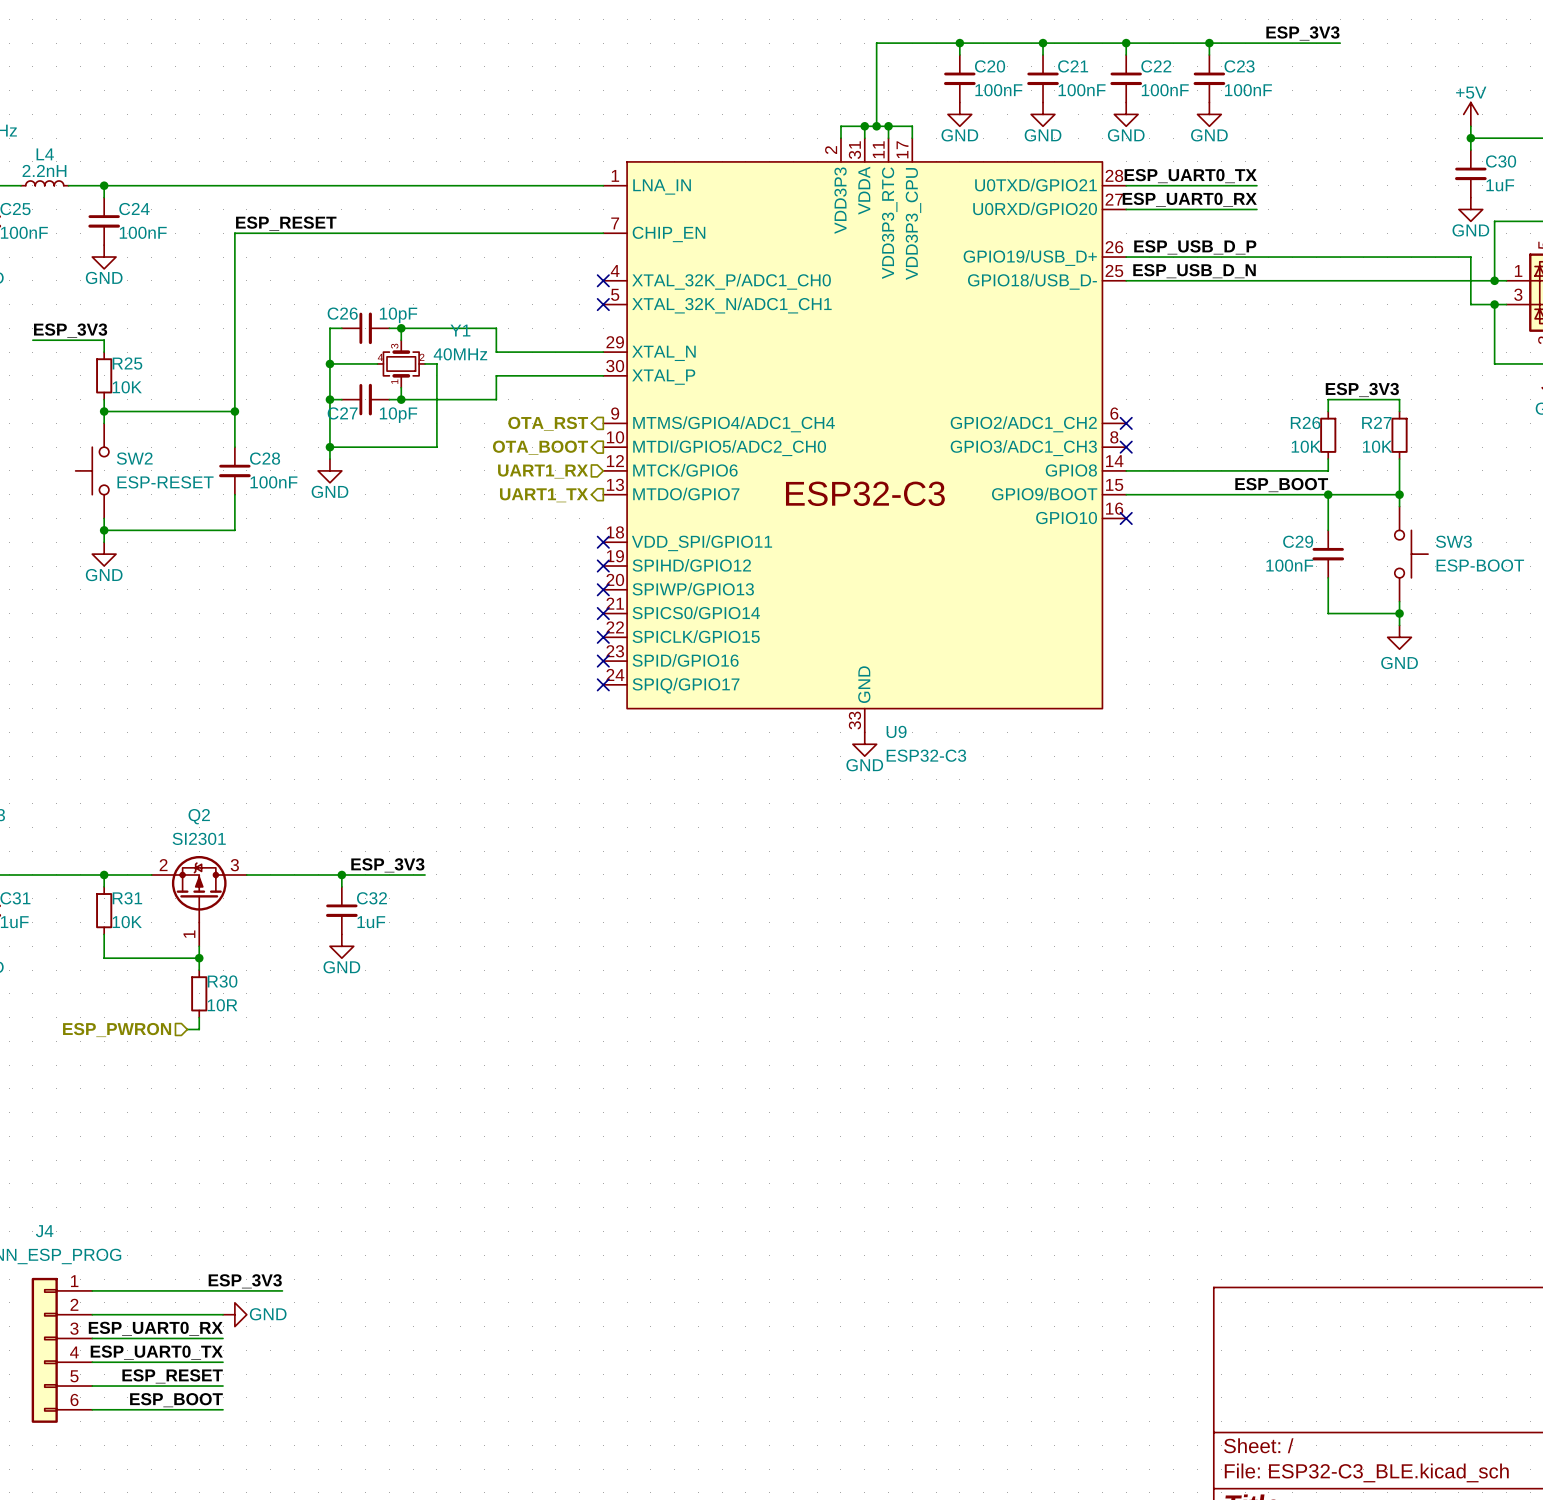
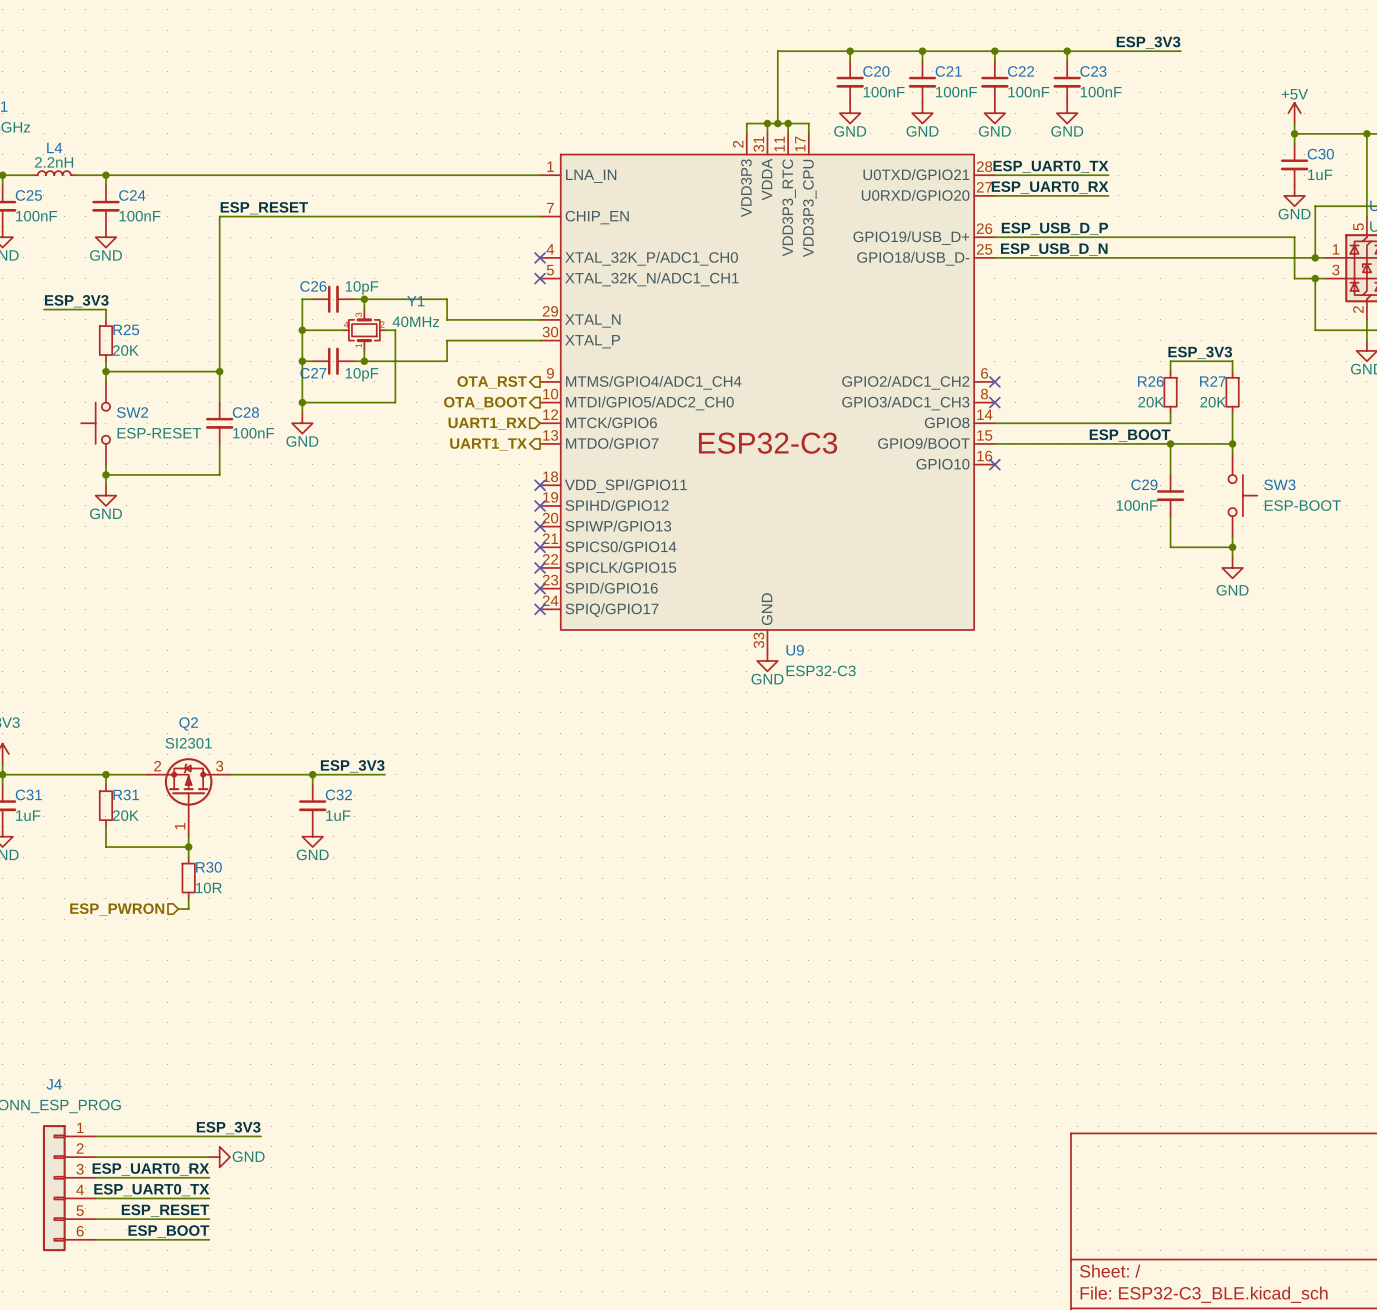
R25 value: 10K (127, 387) -> 20K (125, 350)
R26 value: 10K (1306, 446) -> 20K (1151, 402)
R27 value: 10K (1377, 446) -> 20K (1213, 402)
R31 value: 10K (127, 922) -> 20K (125, 815)

